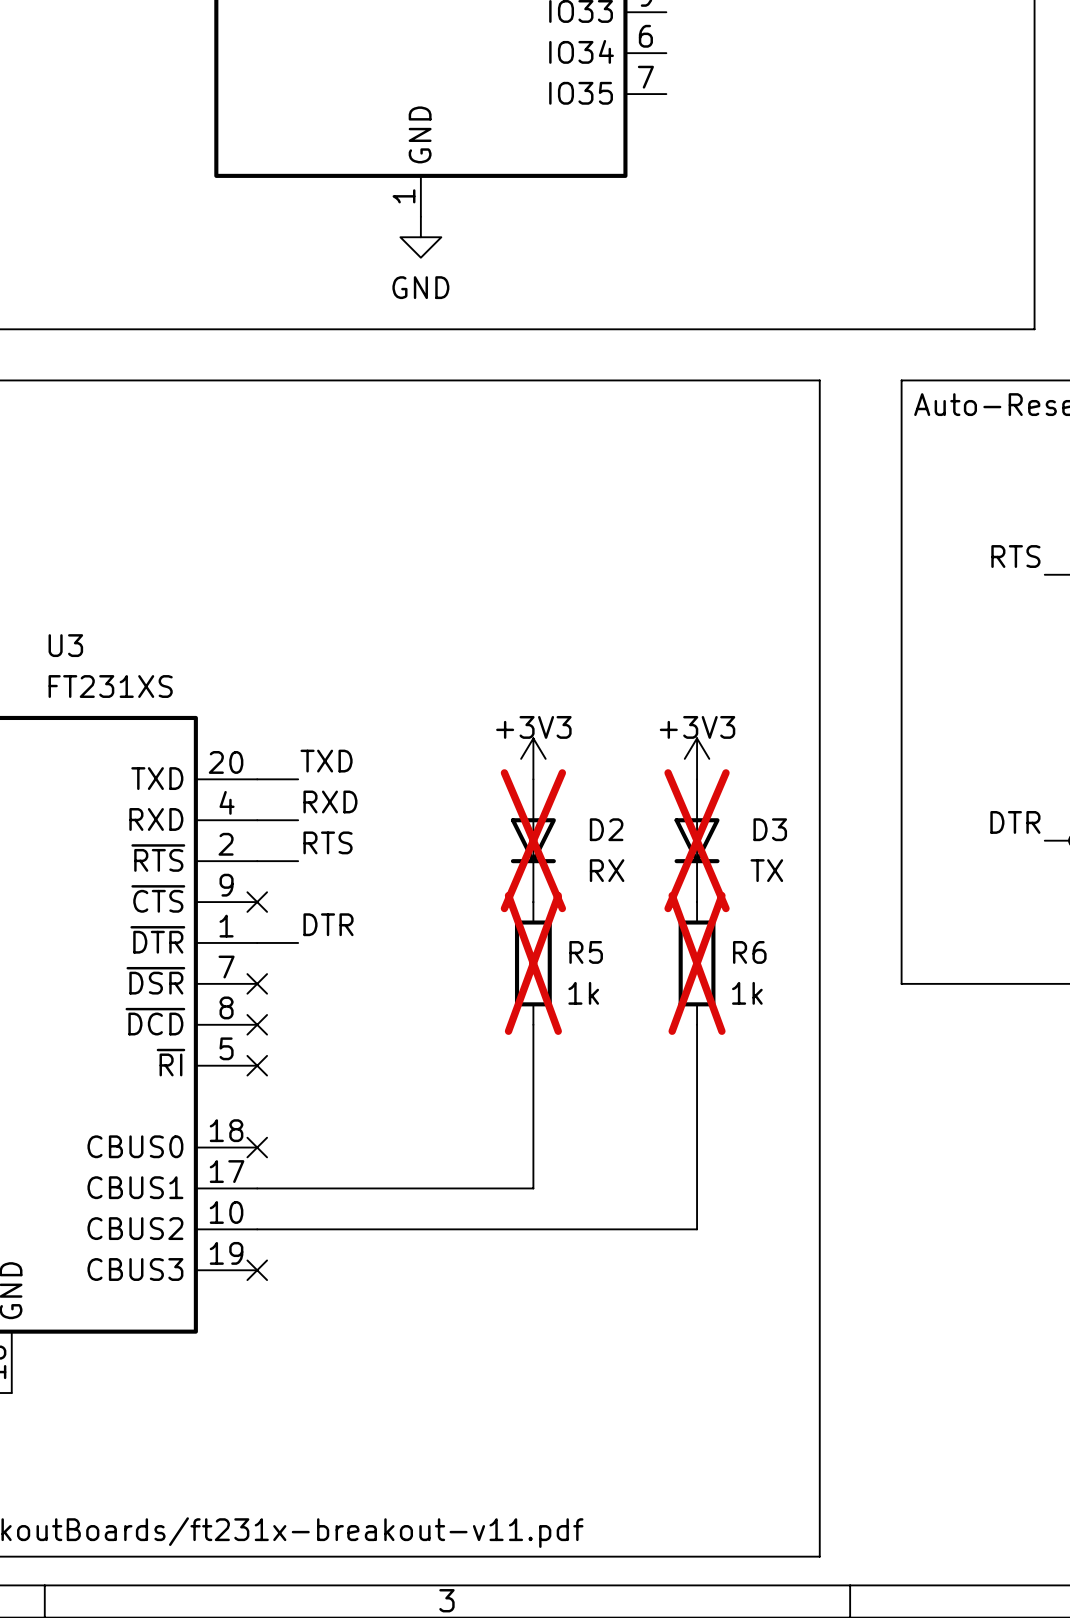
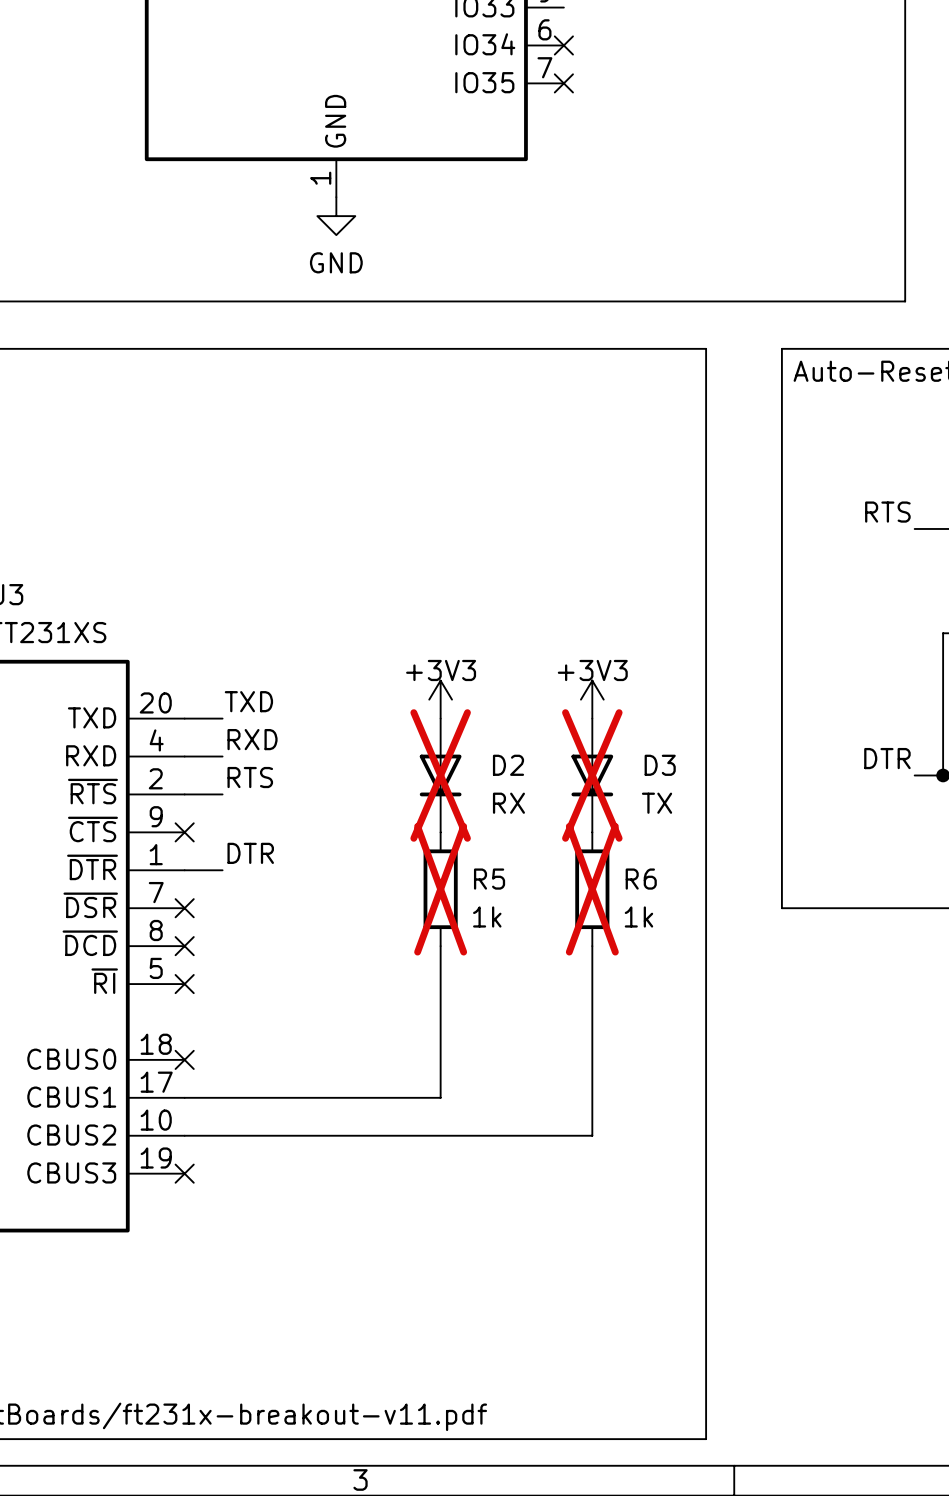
no-connect mark: none -> (563, 45)
no-connect mark: none -> (563, 83)

